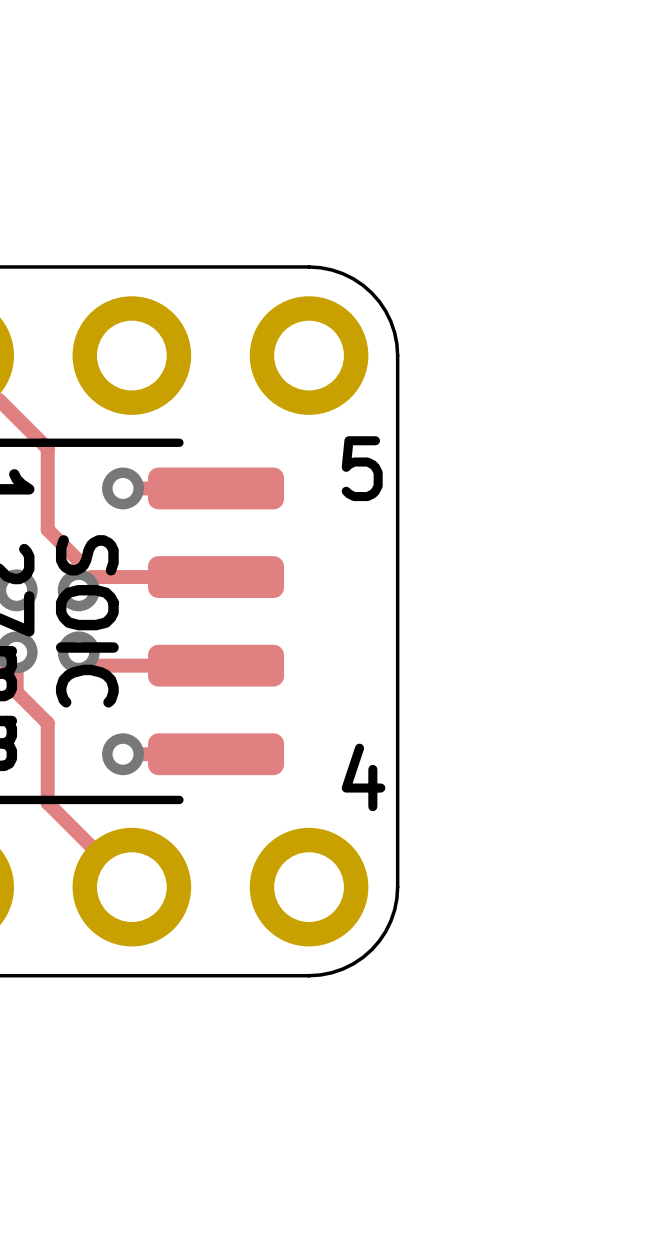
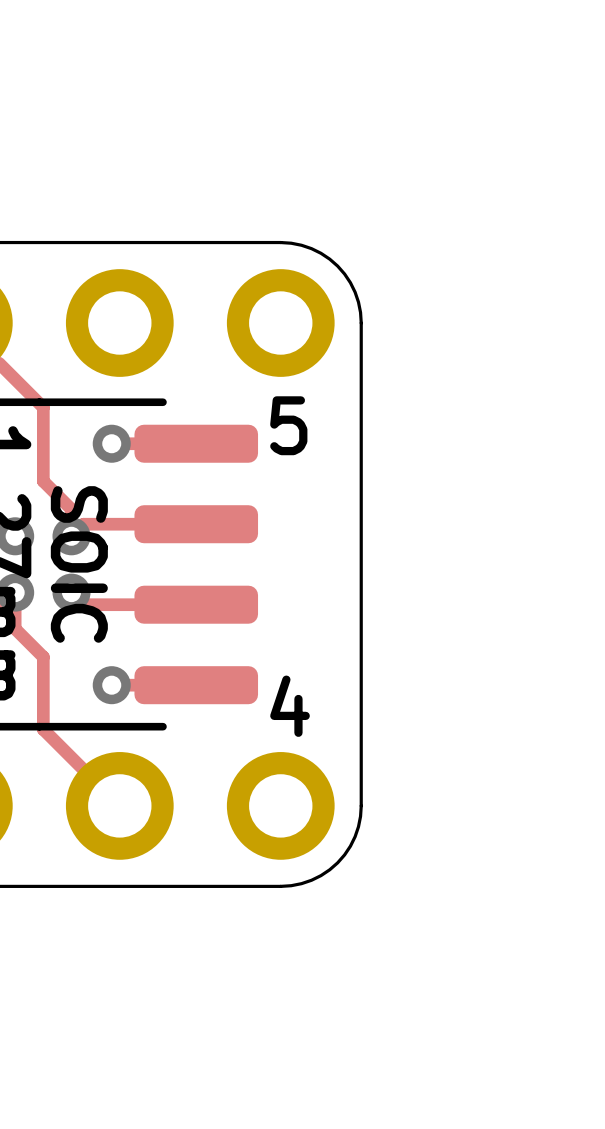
text position: 5 (362, 468) -> 5 (288, 425)
text position: 4 (363, 777) -> 4 (290, 706)

